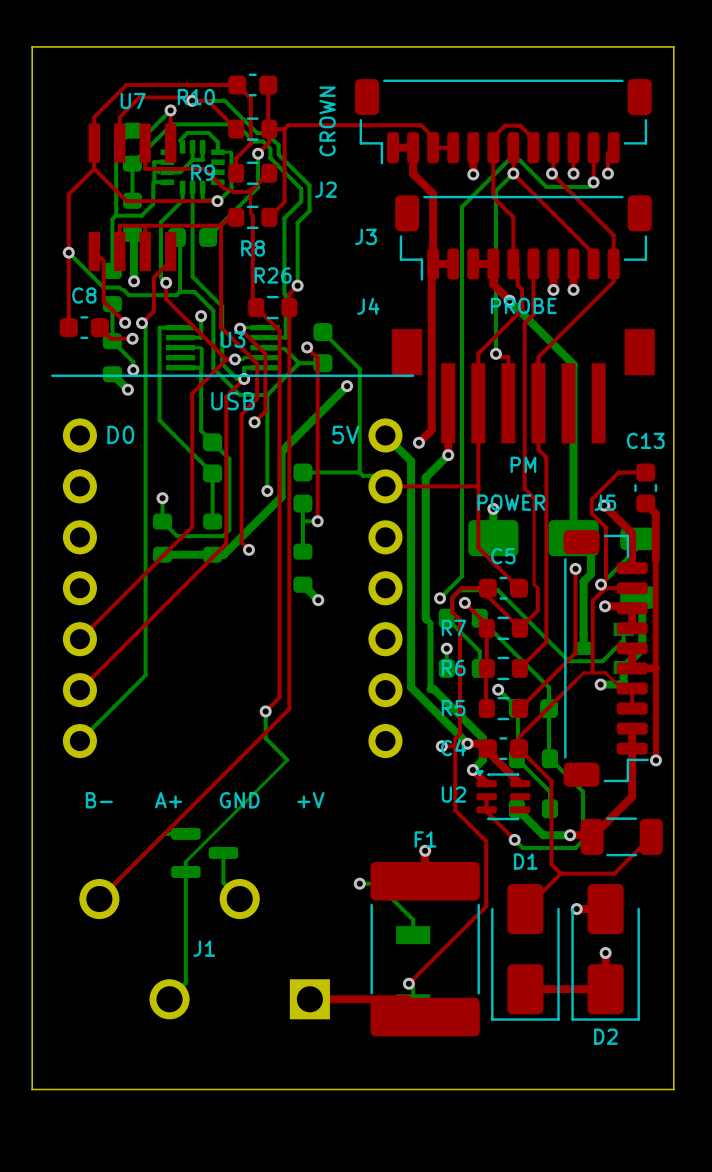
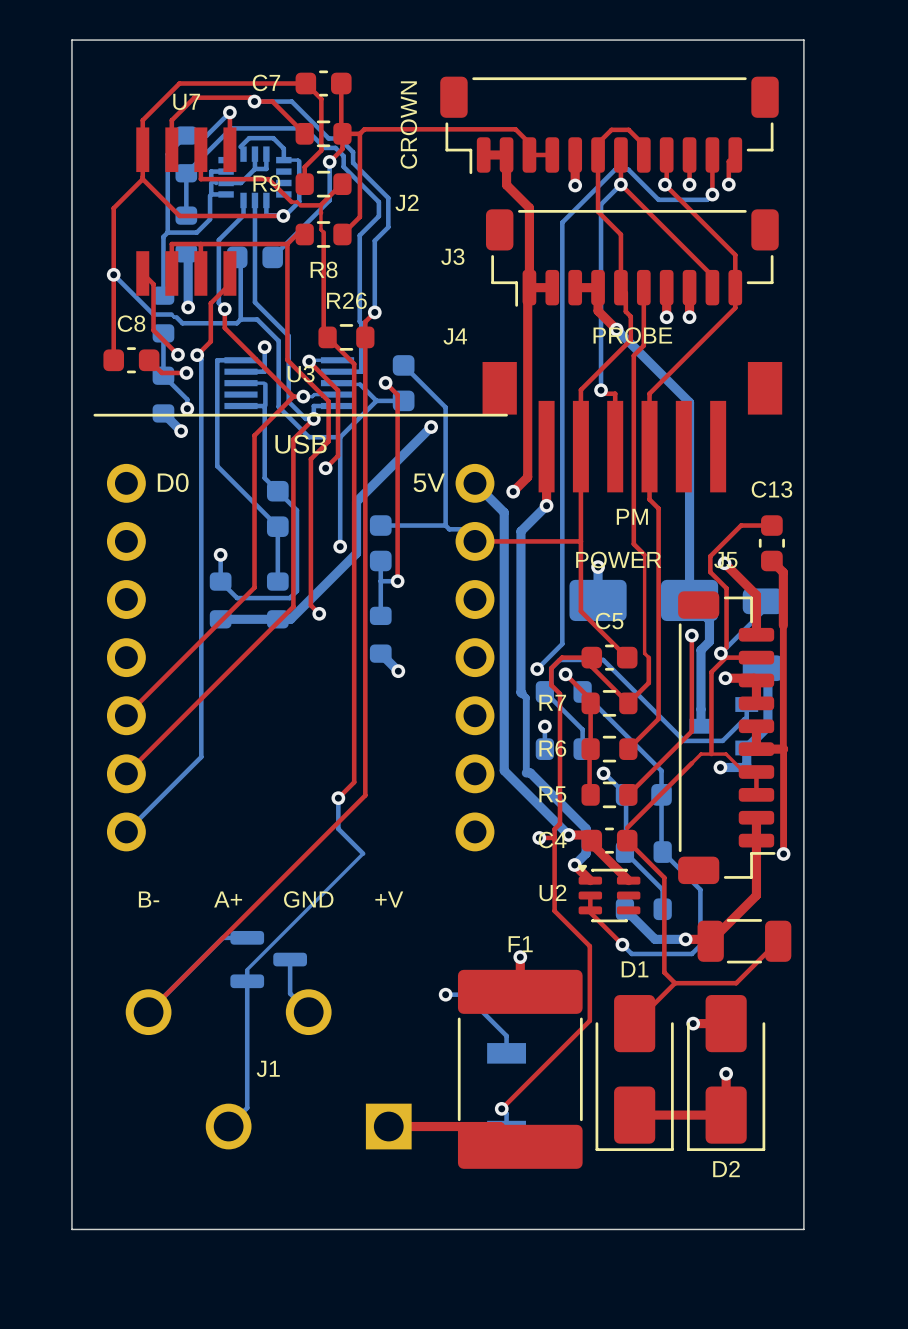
C7 name: none -> C7 (266, 82)
R10 name: R10 (196, 97) -> none

